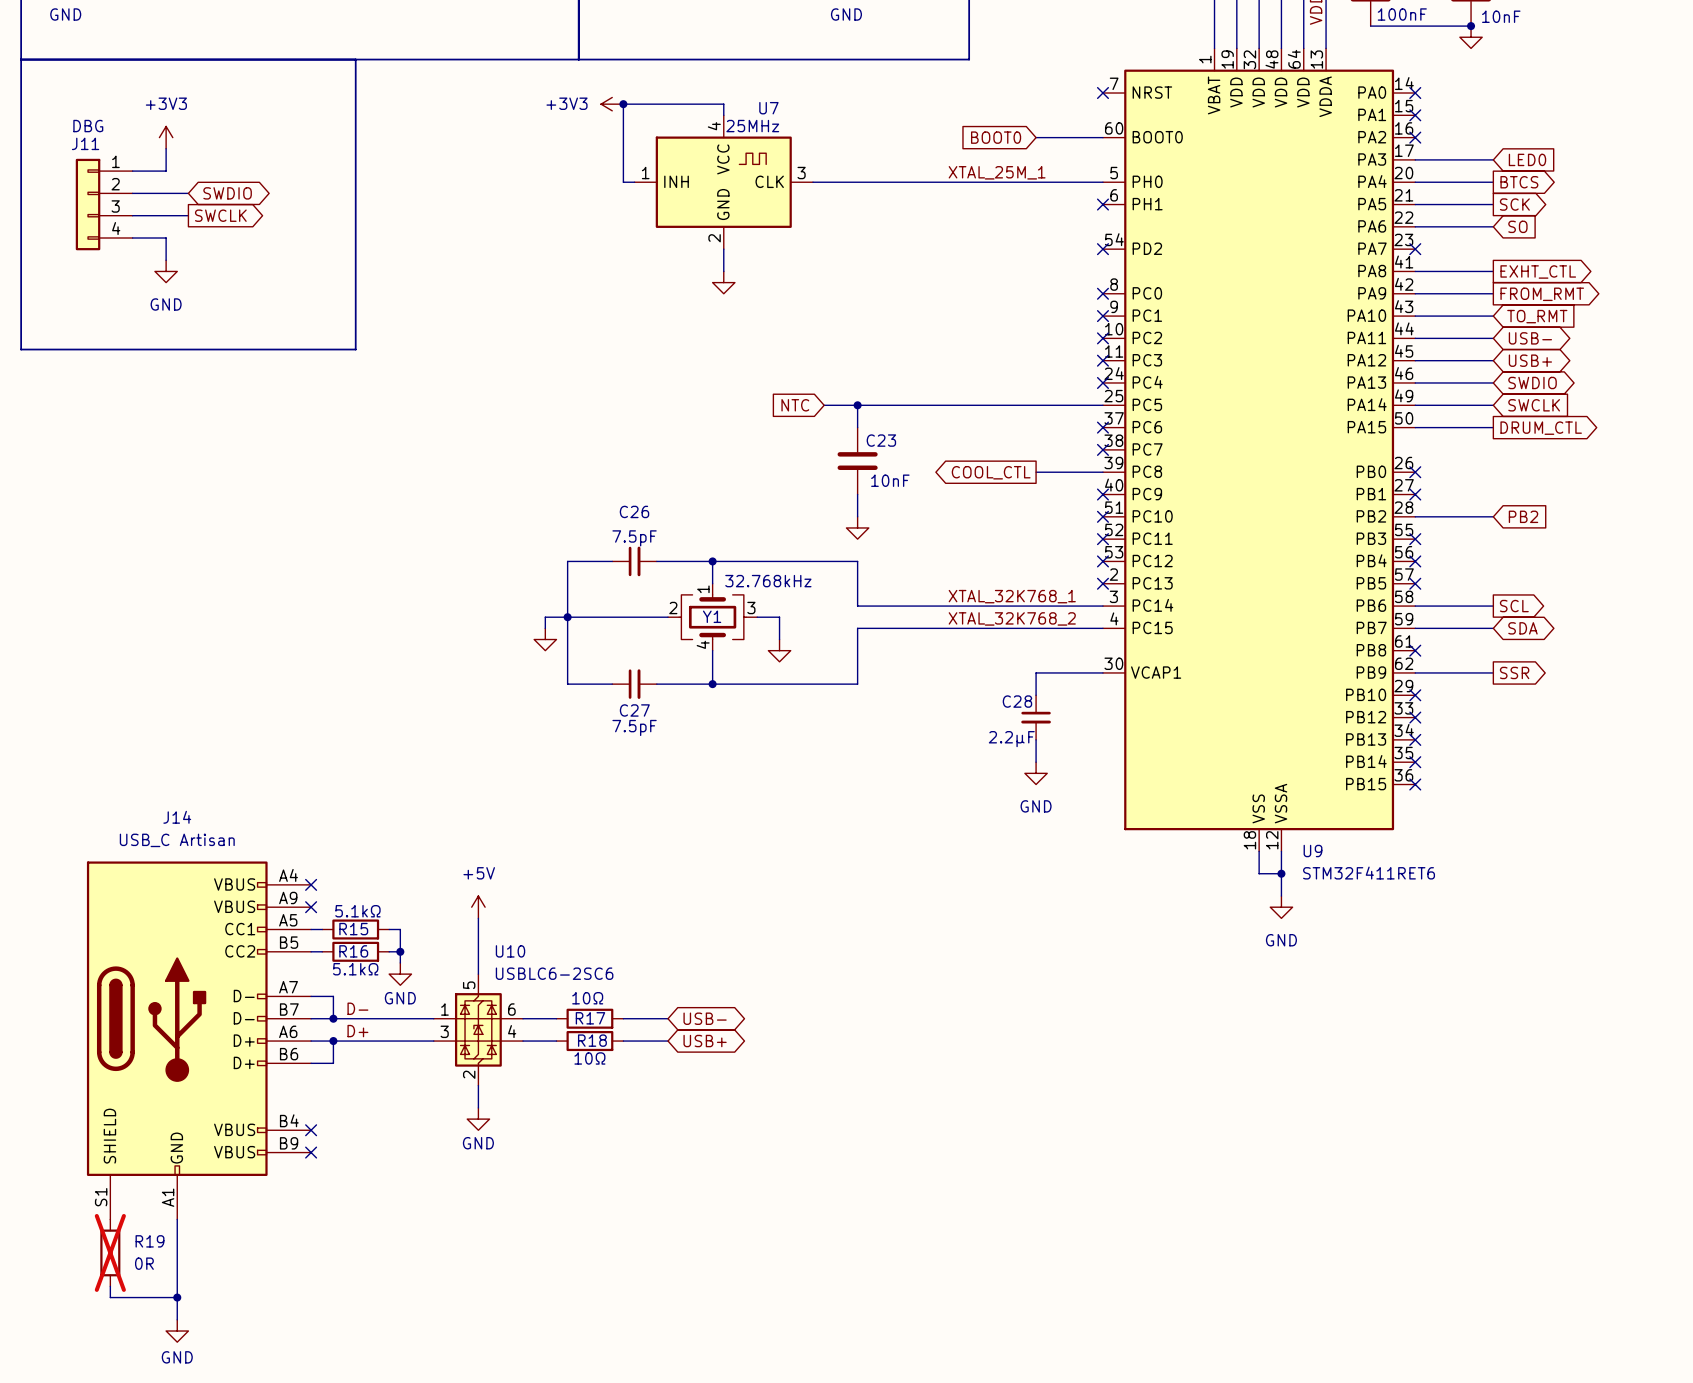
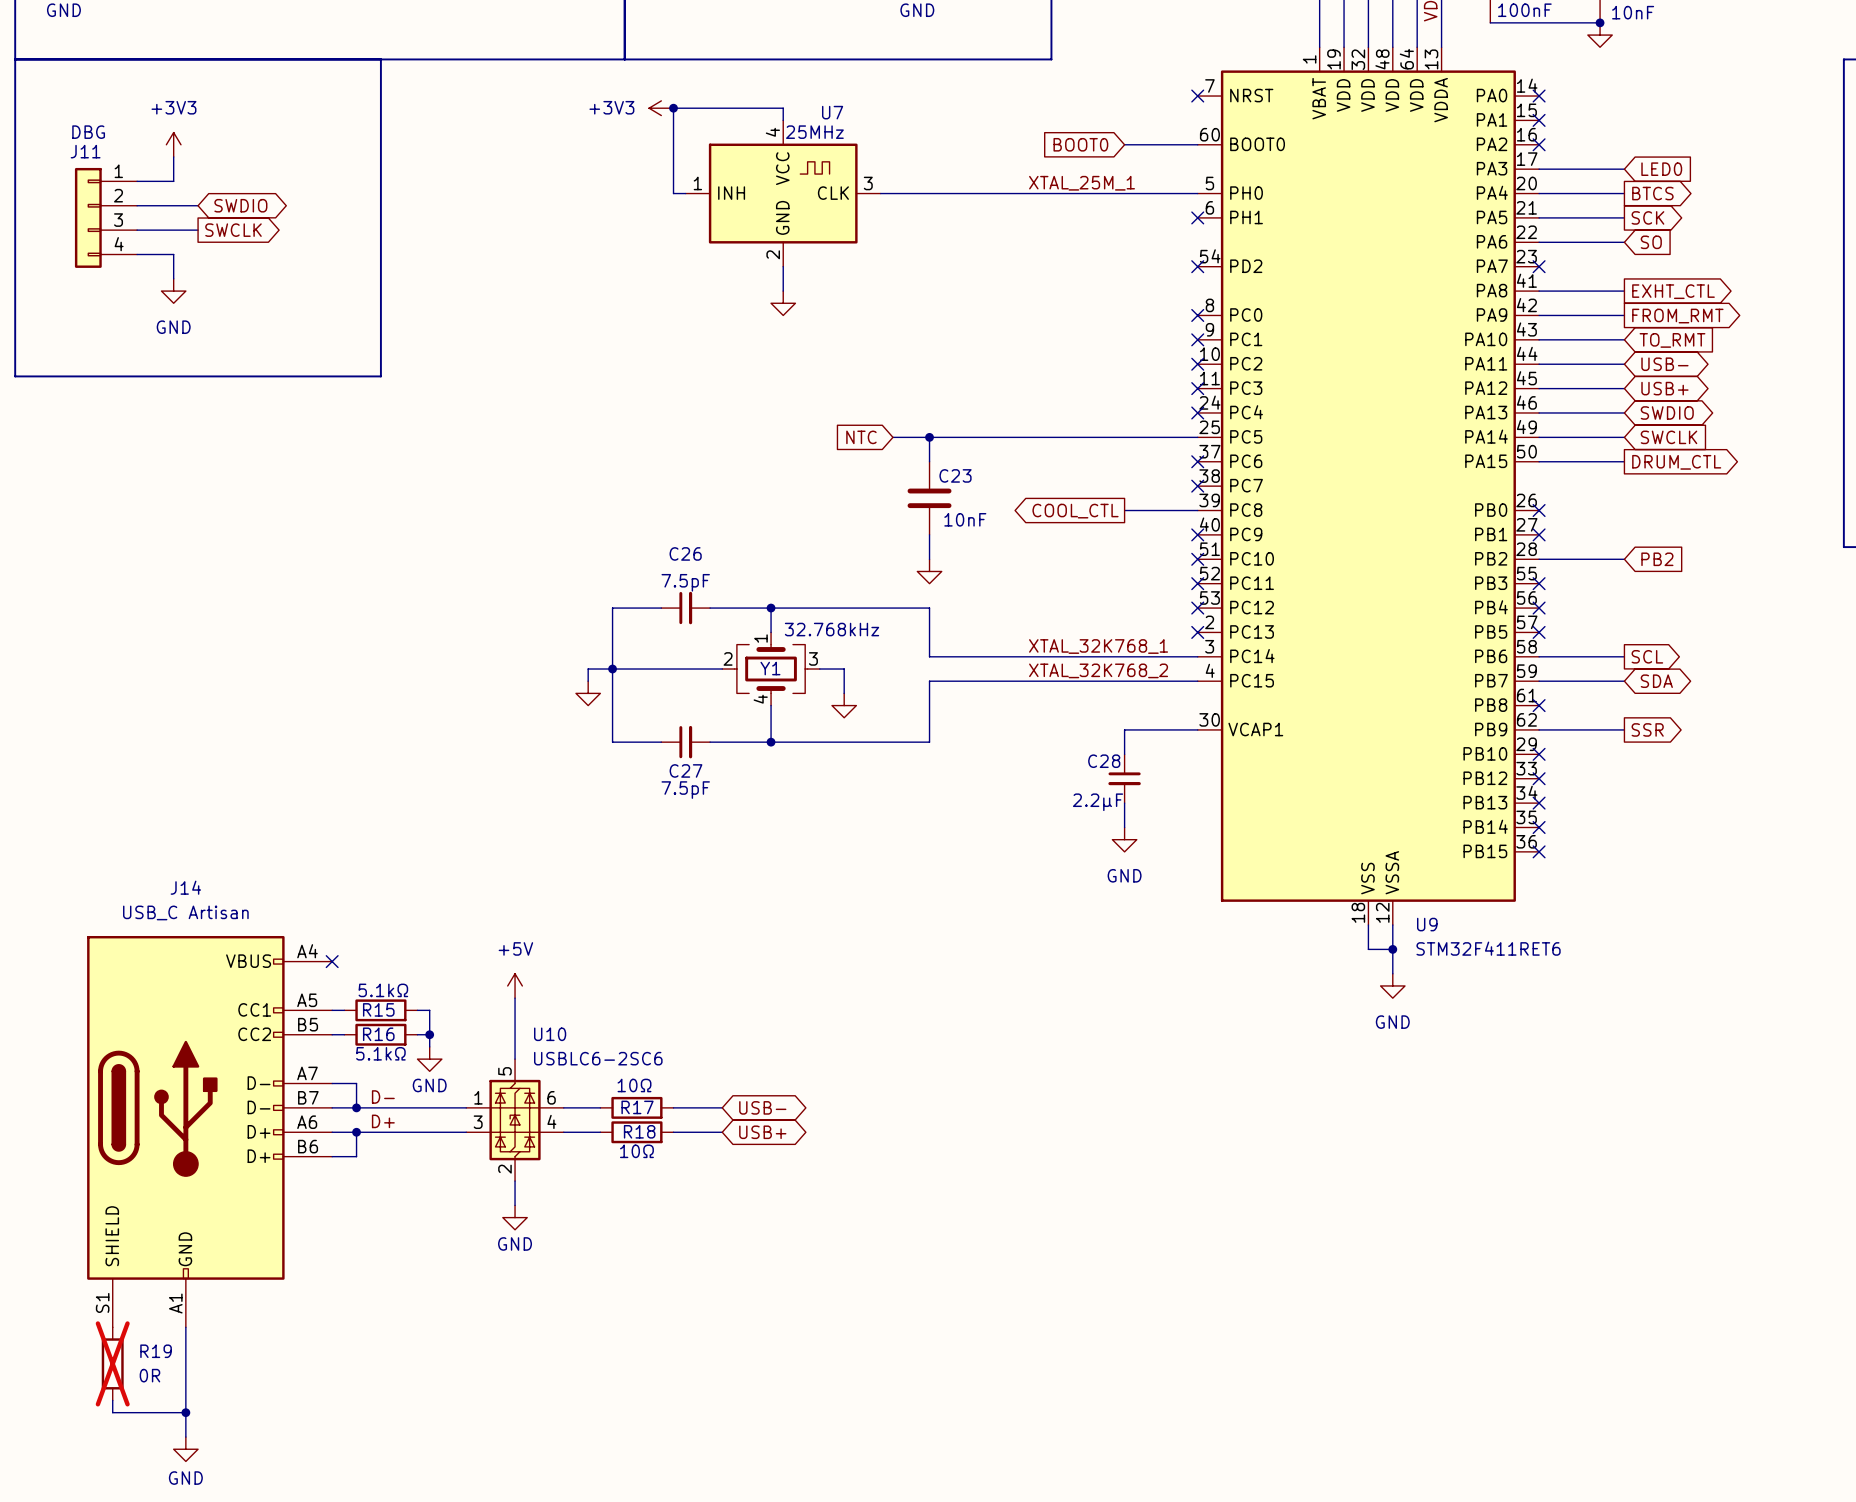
J14 symbol: [86, 861, 312, 1220] -> [87, 935, 333, 1328]
no-connect mark: (311, 907) -> none
no-connect mark: (311, 1130) -> none
no-connect mark: (311, 1152) -> none

